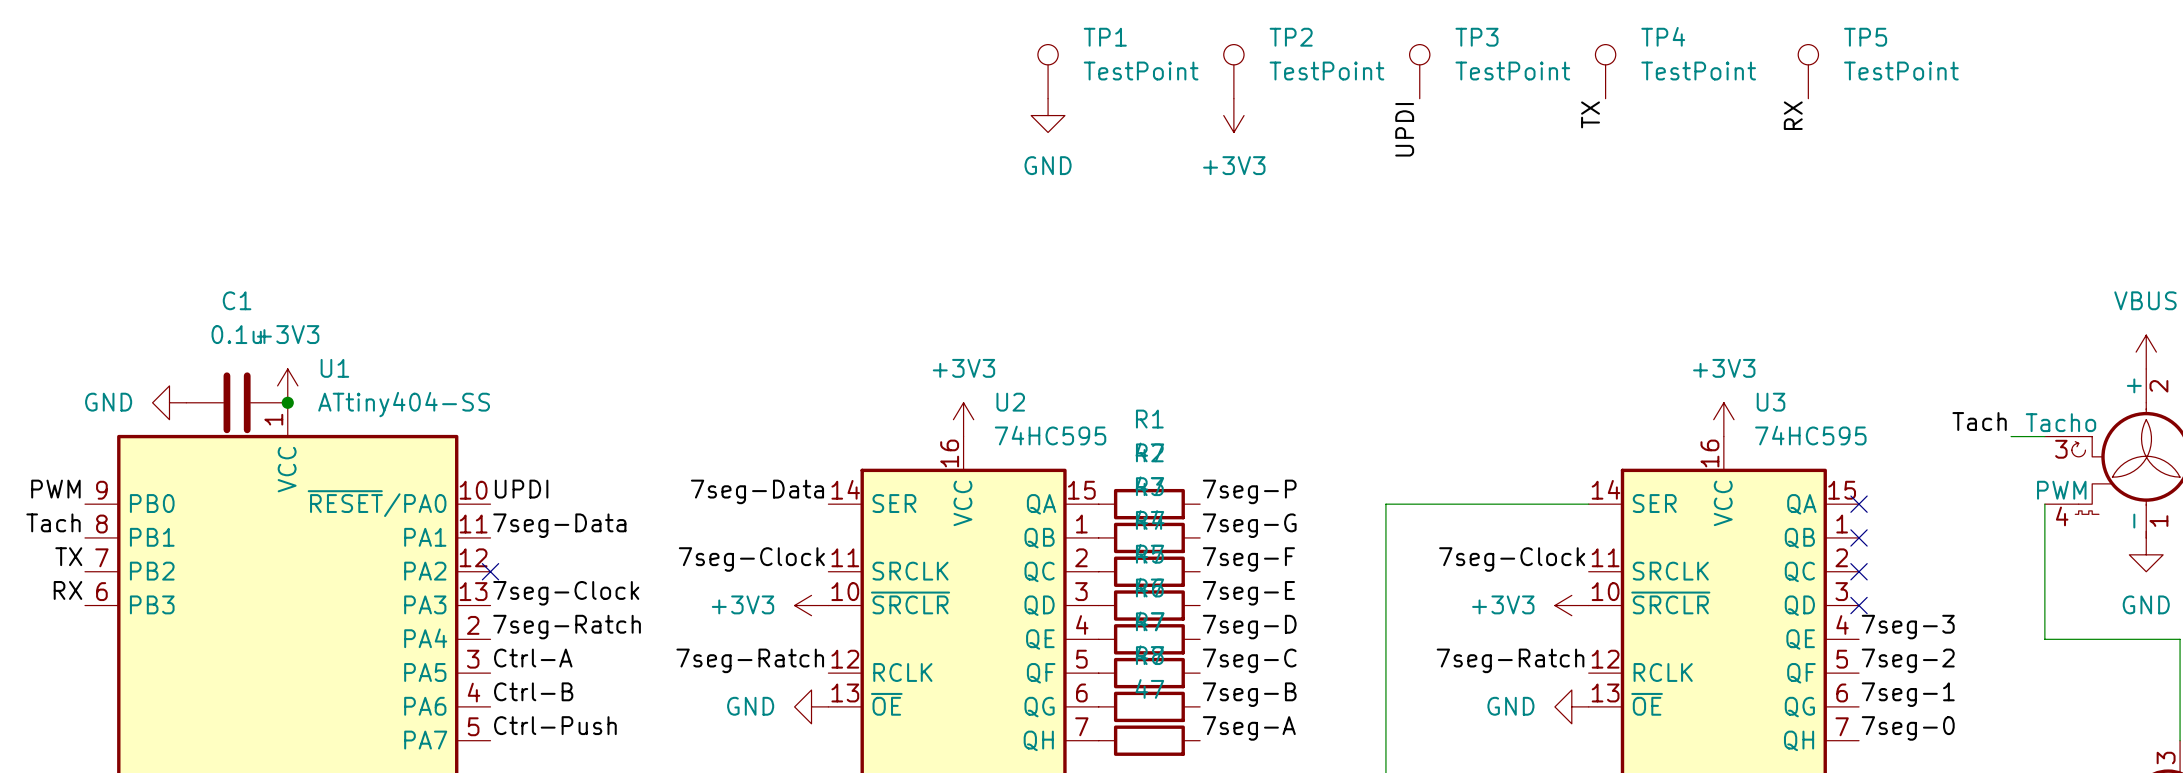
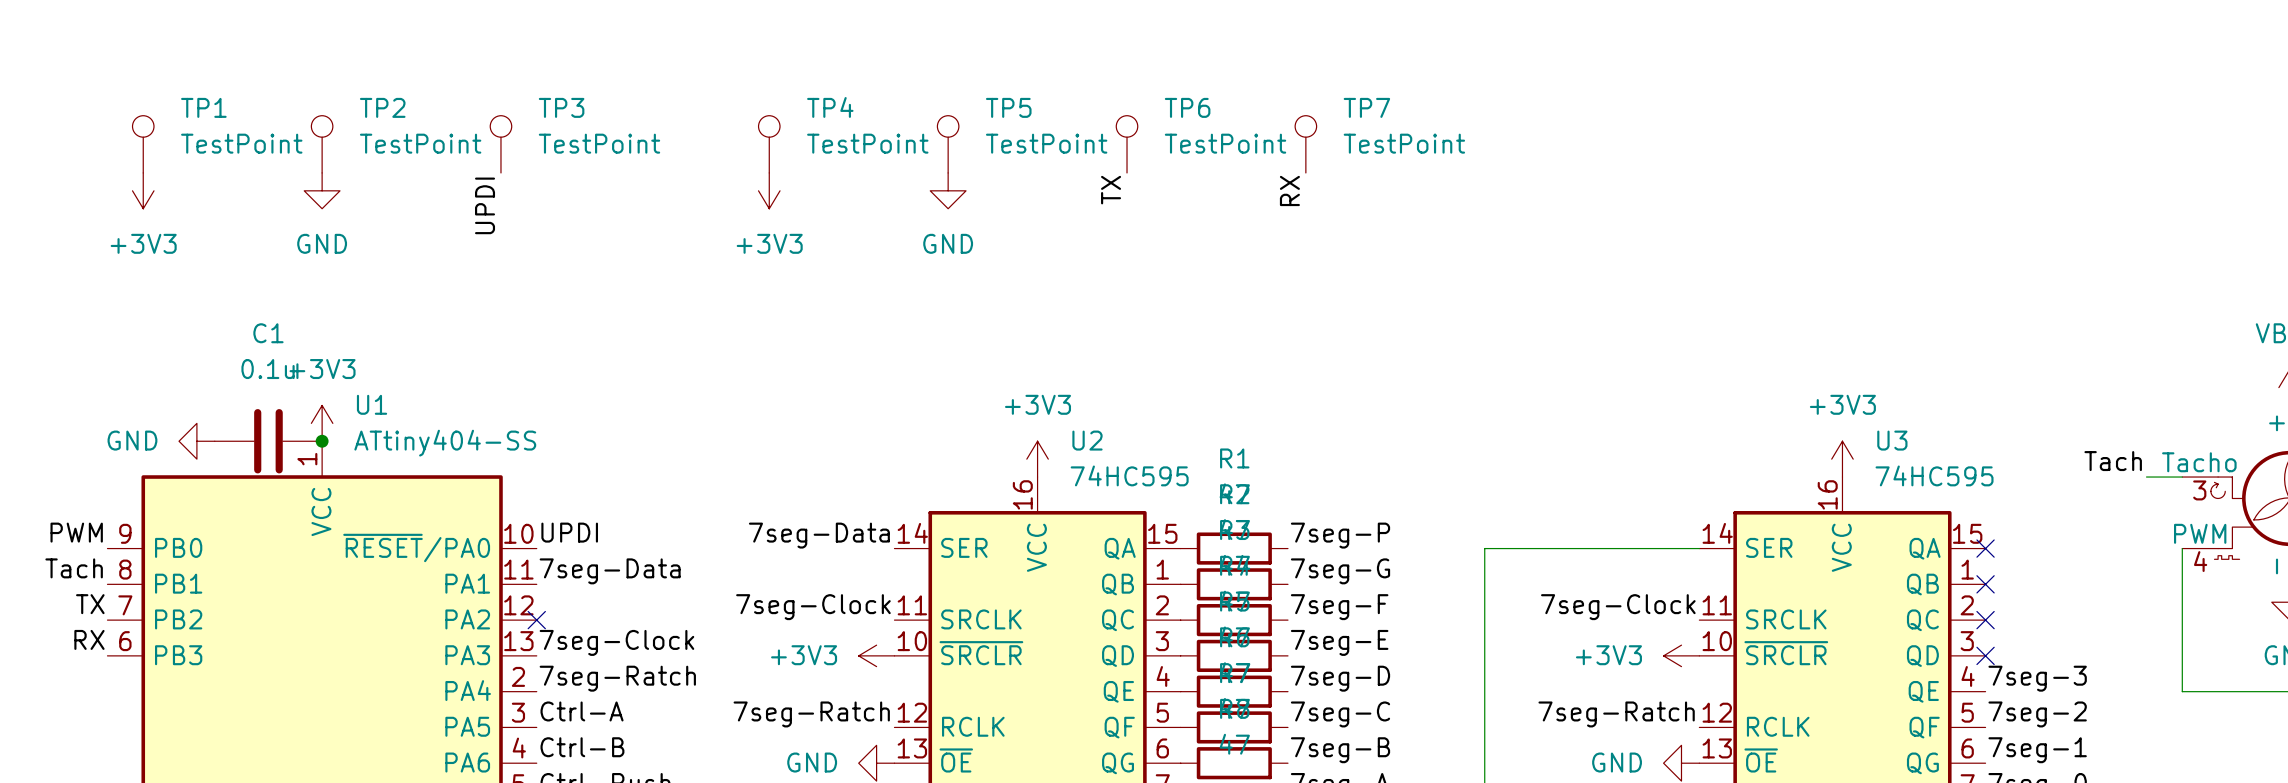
TP1 position: (1048, 71) -> (143, 144)
TP2 position: (1233, 71) -> (322, 144)
TP3 position: (1419, 71) -> (500, 144)
TP4 position: (1605, 71) -> (769, 144)
TP5 position: (1808, 71) -> (948, 144)
label: TX (1590, 114) -> none
power symbol position: GND (1048, 115) -> GND (948, 190)
power symbol: +3V3 (1233, 115) -> none
label: RX (1793, 115) -> none
TP6: none -> TestPoint (1127, 144)
TP7: none -> TestPoint (1305, 144)
label: UPDI (1404, 129) -> none
label: none -> TX (1111, 190)
power symbol: none -> +3V3 (143, 190)
power symbol: none -> GND (322, 190)
power symbol: none -> +3V3 (769, 190)
label: none -> RX (1289, 190)
label: none -> UPDI (485, 205)

